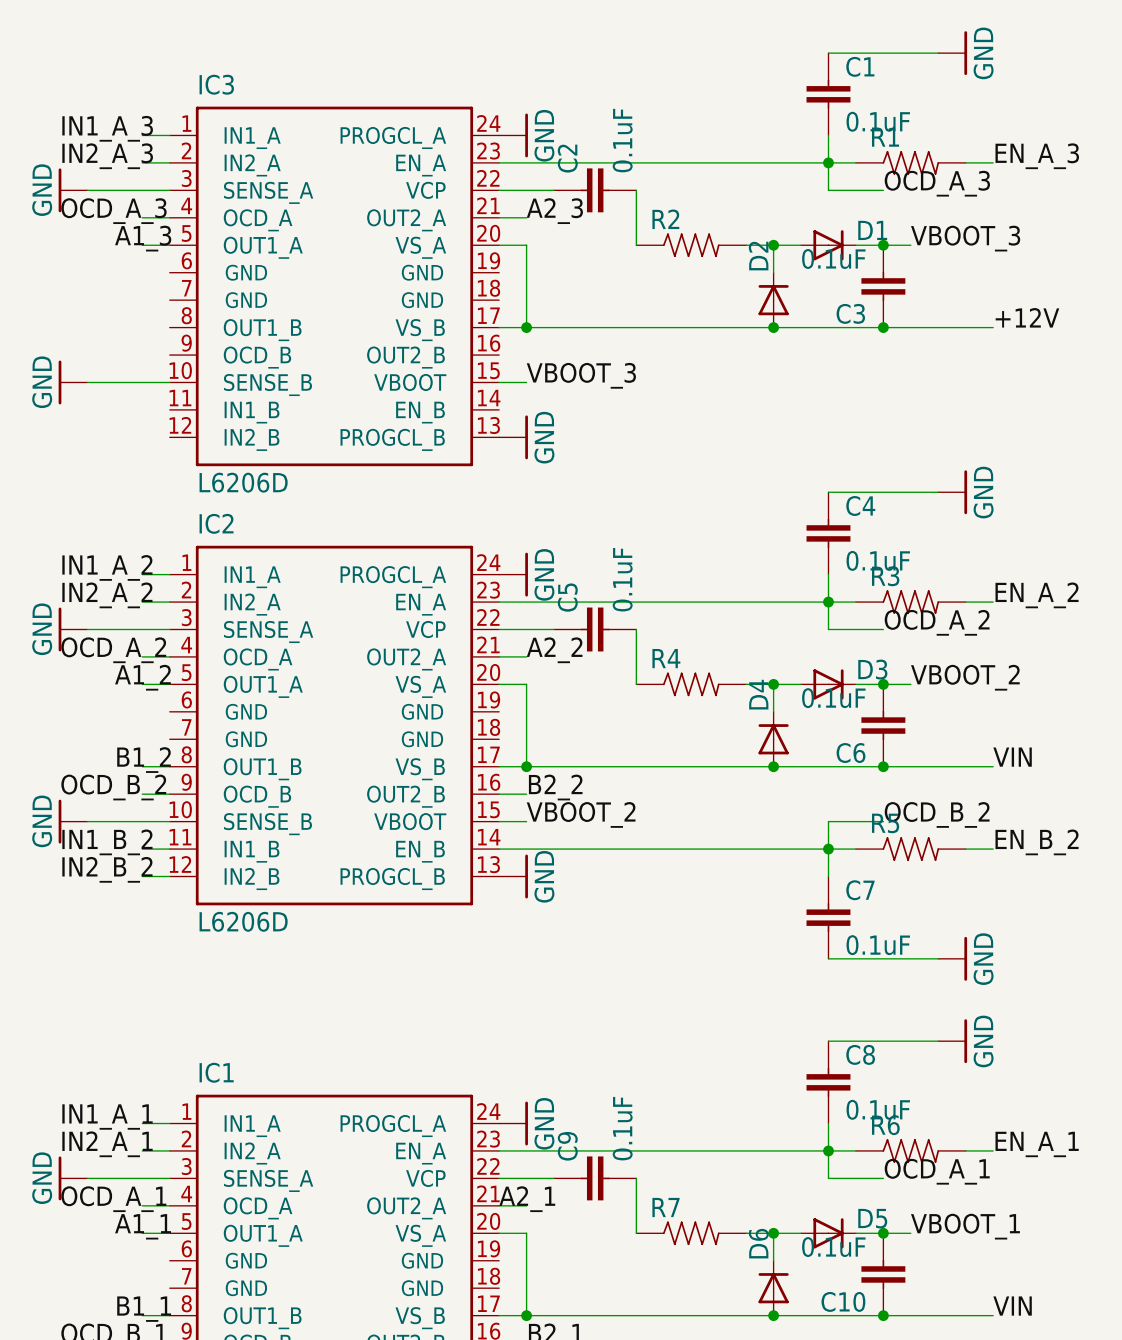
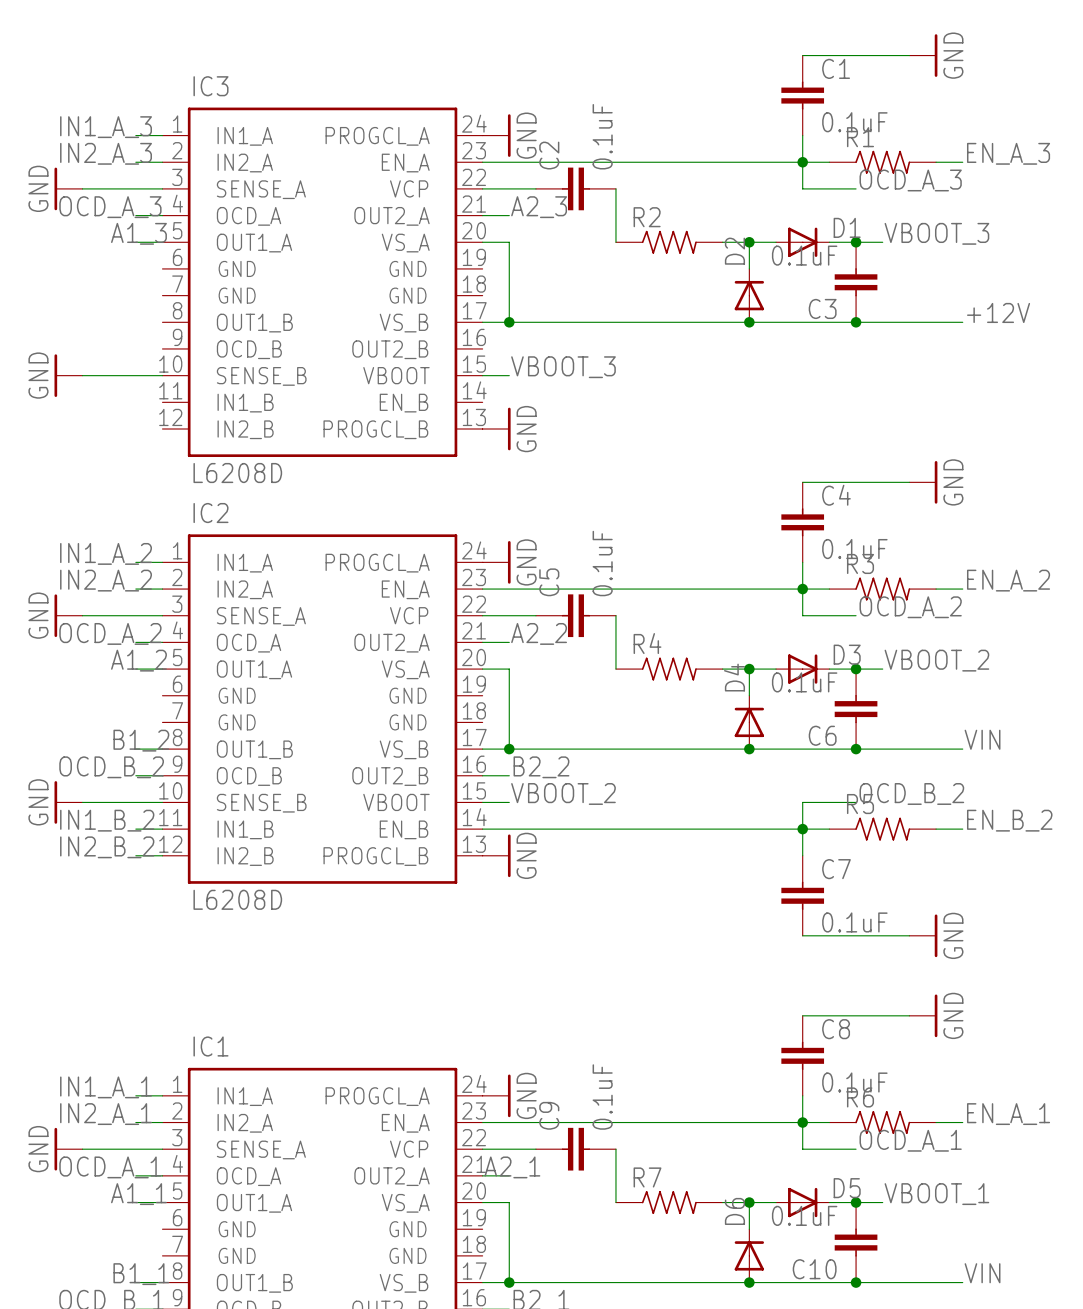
IC3 value: L6206D (243, 482) -> L6208D (237, 473)
IC2 value: L6206D (243, 921) -> L6208D (237, 899)

